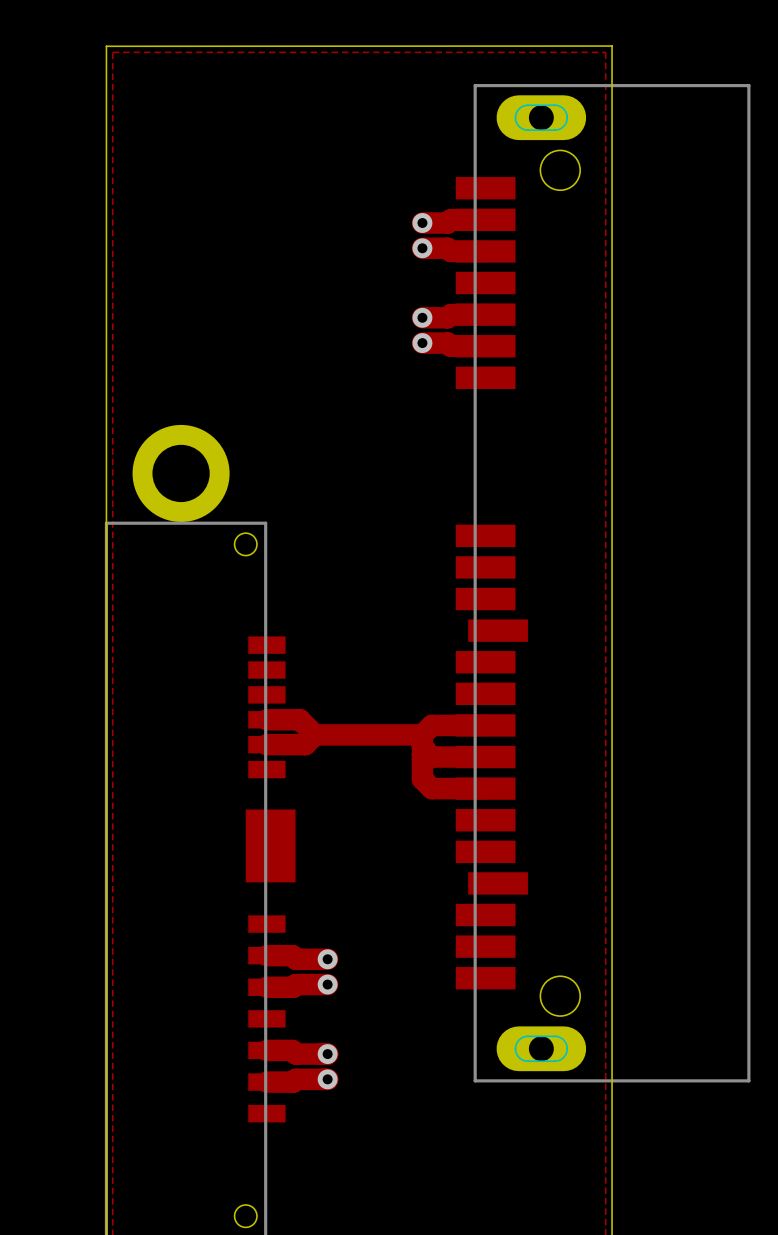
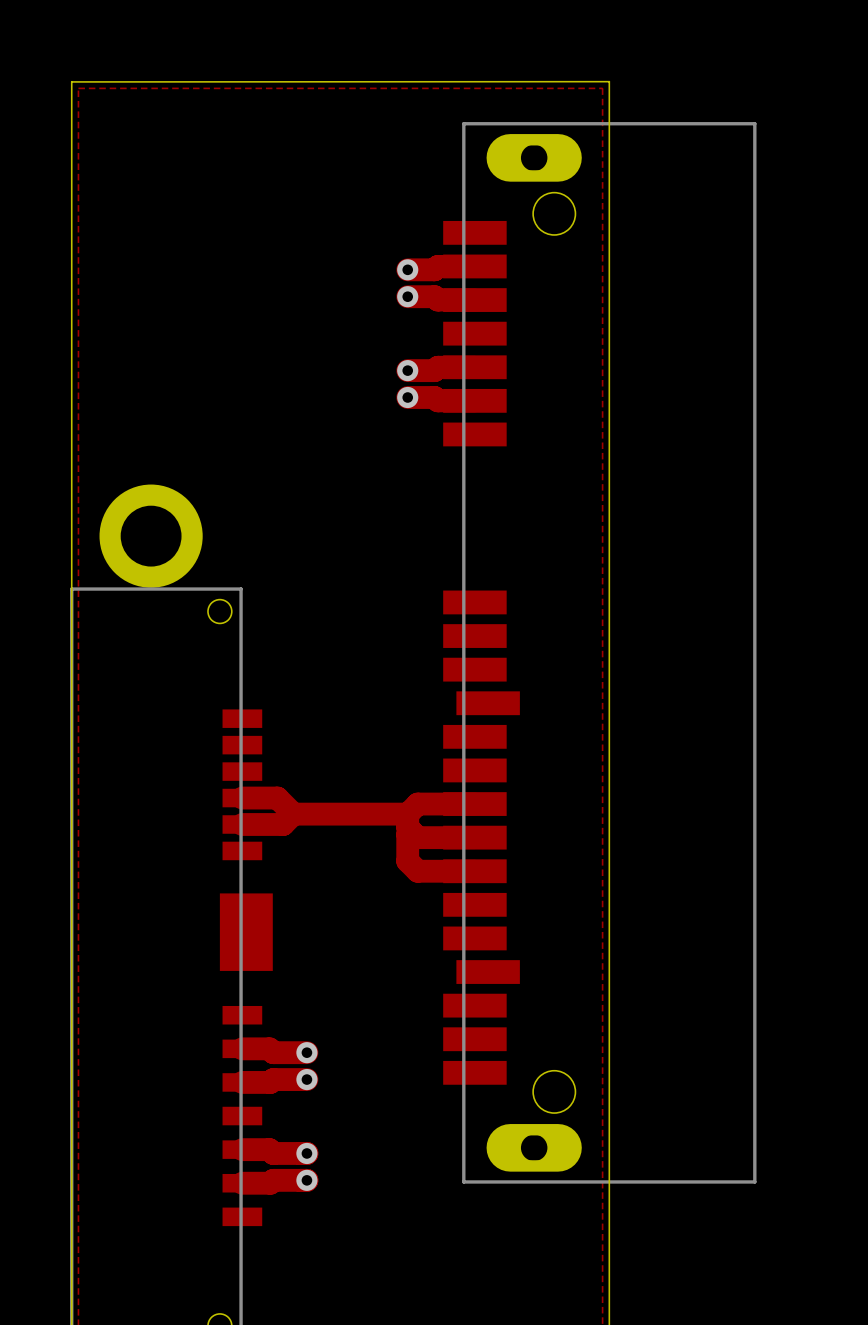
part footprint: [455, 84, 751, 1083] -> [443, 122, 757, 1184]

